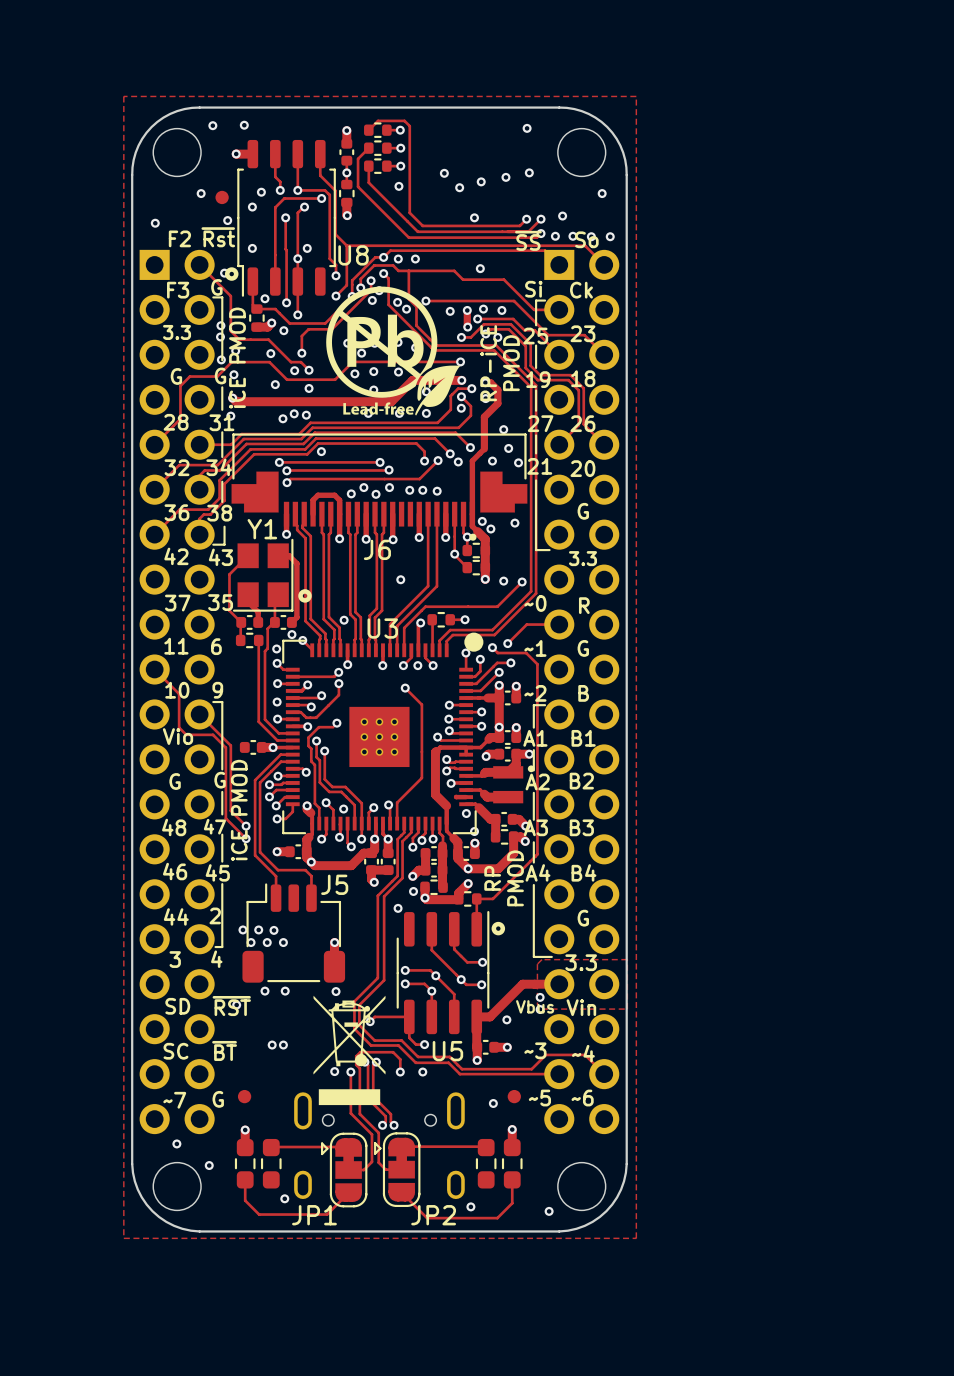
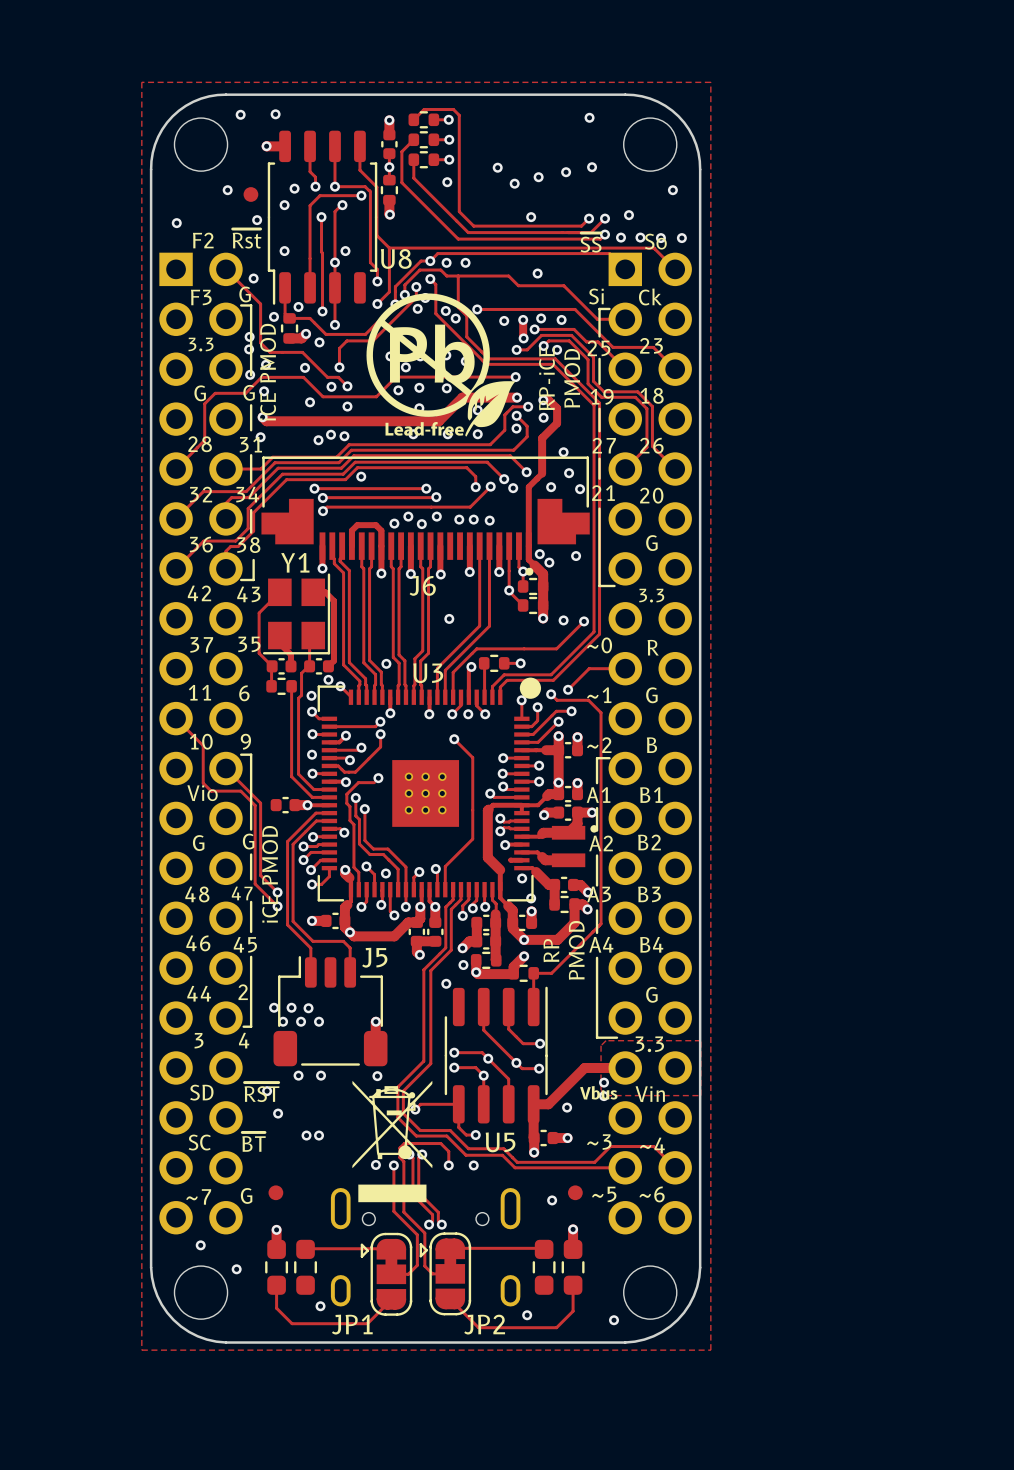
U8 footprint: [224, 139, 336, 297] -> [267, 130, 378, 305]
via: none -> (273, 316)
Y1 footprint: [232, 538, 312, 612] -> [262, 573, 331, 655]
U5 footprint: [396, 910, 506, 1035] -> [444, 986, 548, 1124]
via: none -> (278, 1113)

